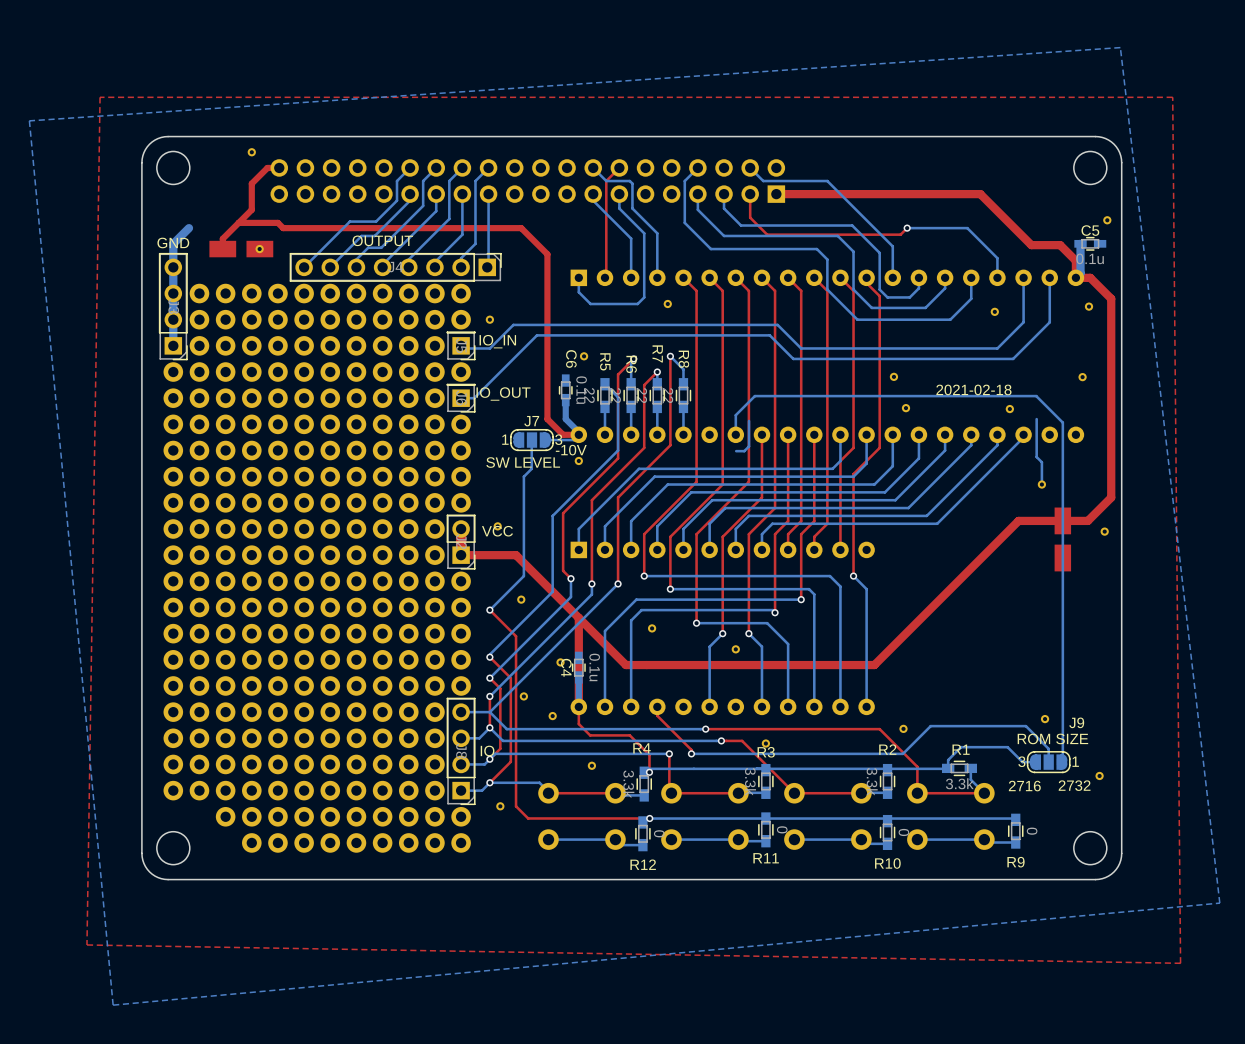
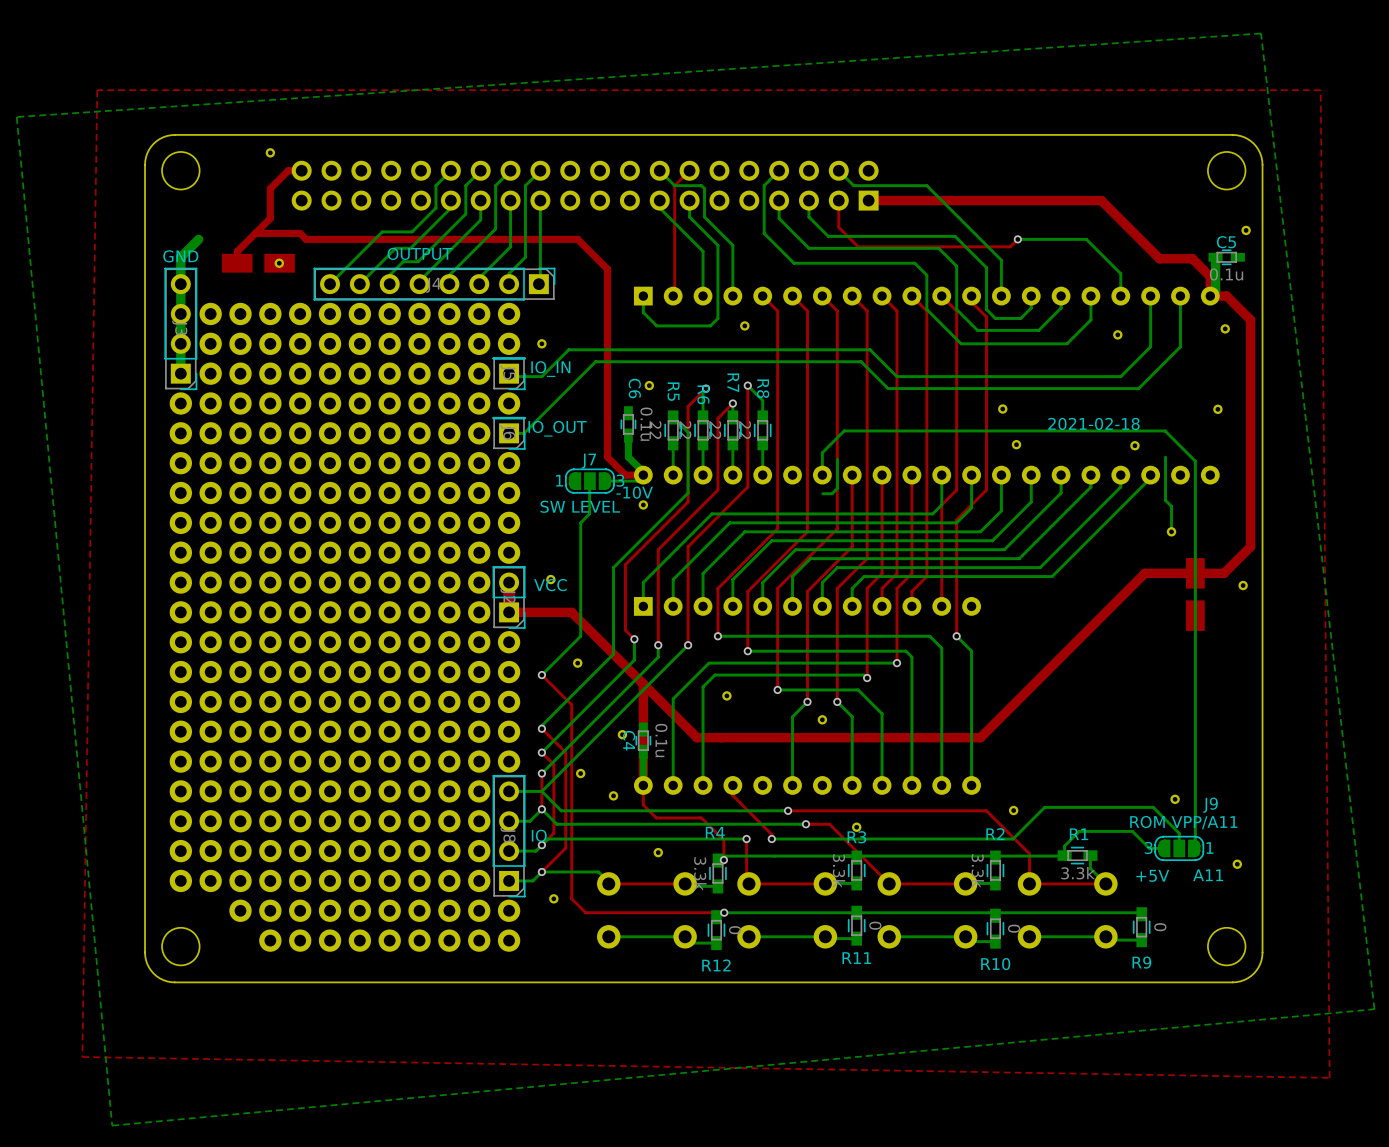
J9 value: ROM SIZE (1052, 738) -> ROM VPP/A11 (1183, 822)
text: 2732 (1074, 785) -> A11 (1208, 875)
text: 2716 (1024, 786) -> +5V (1152, 875)

